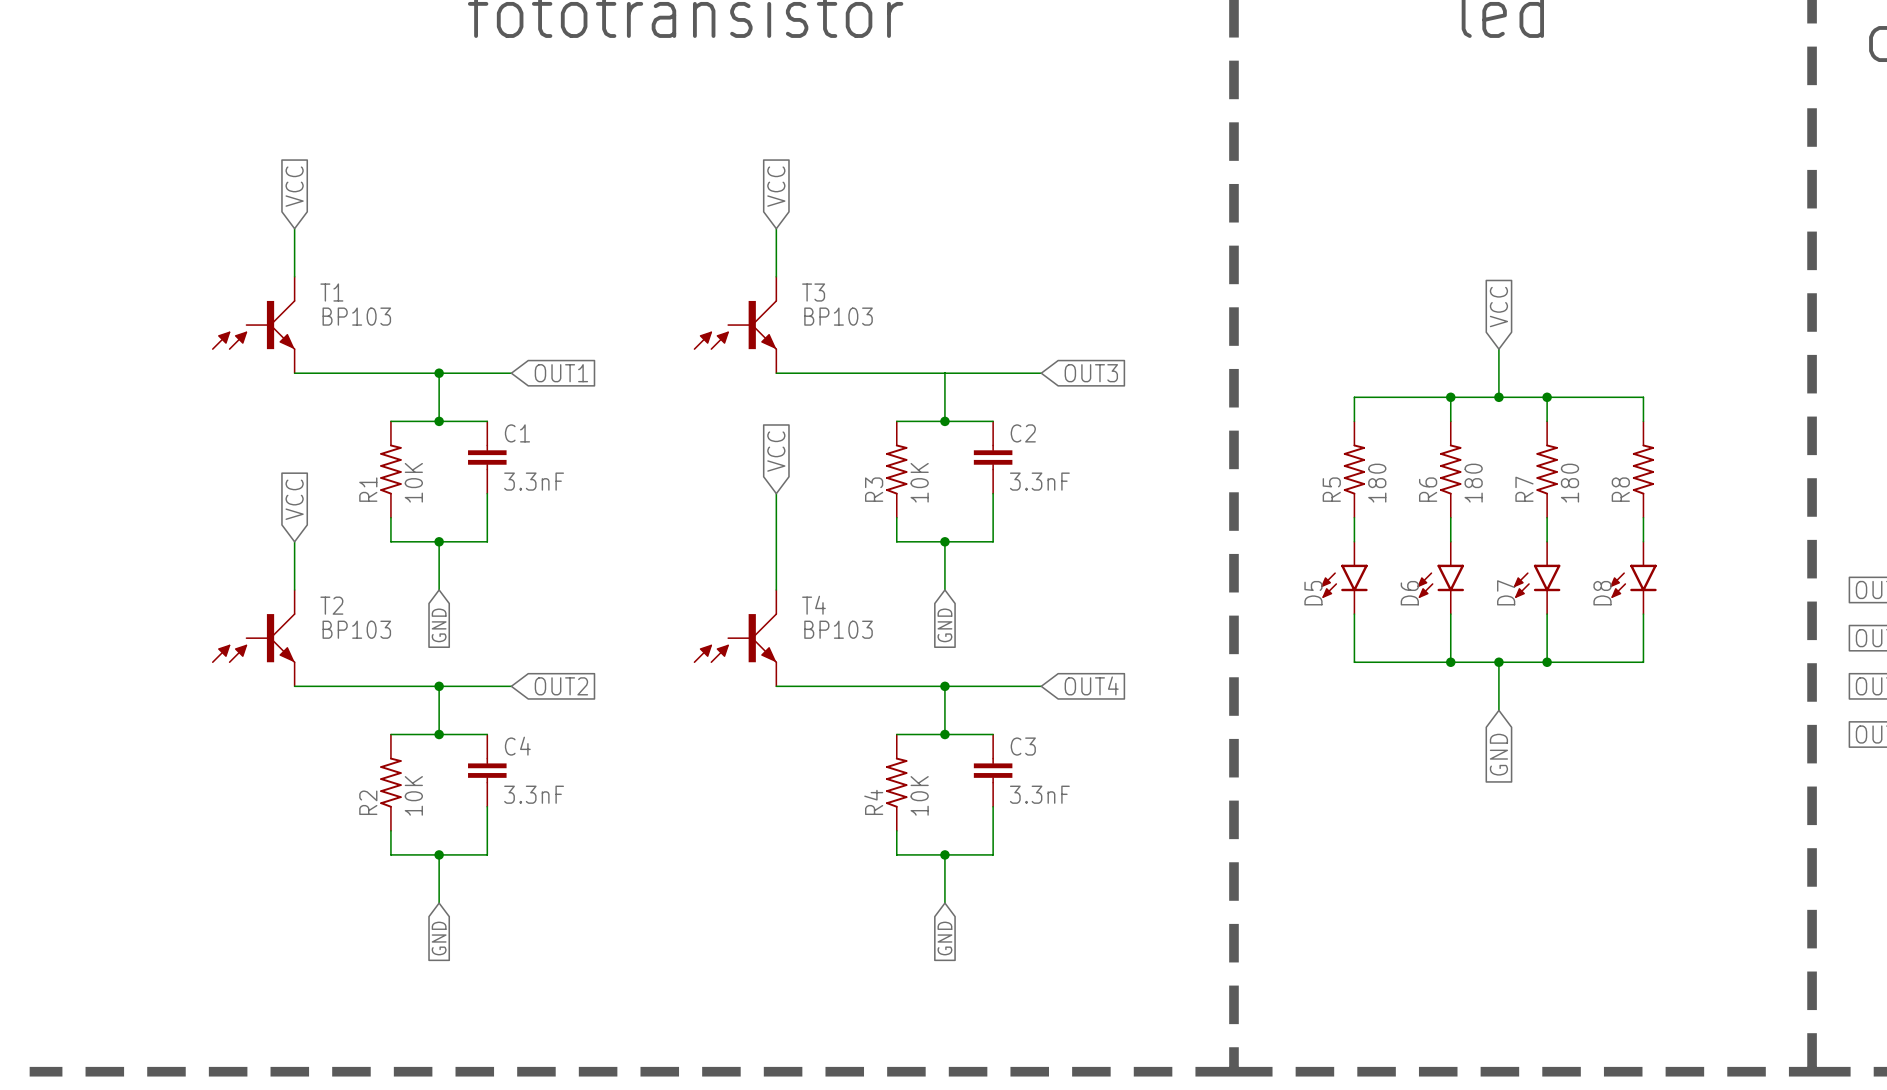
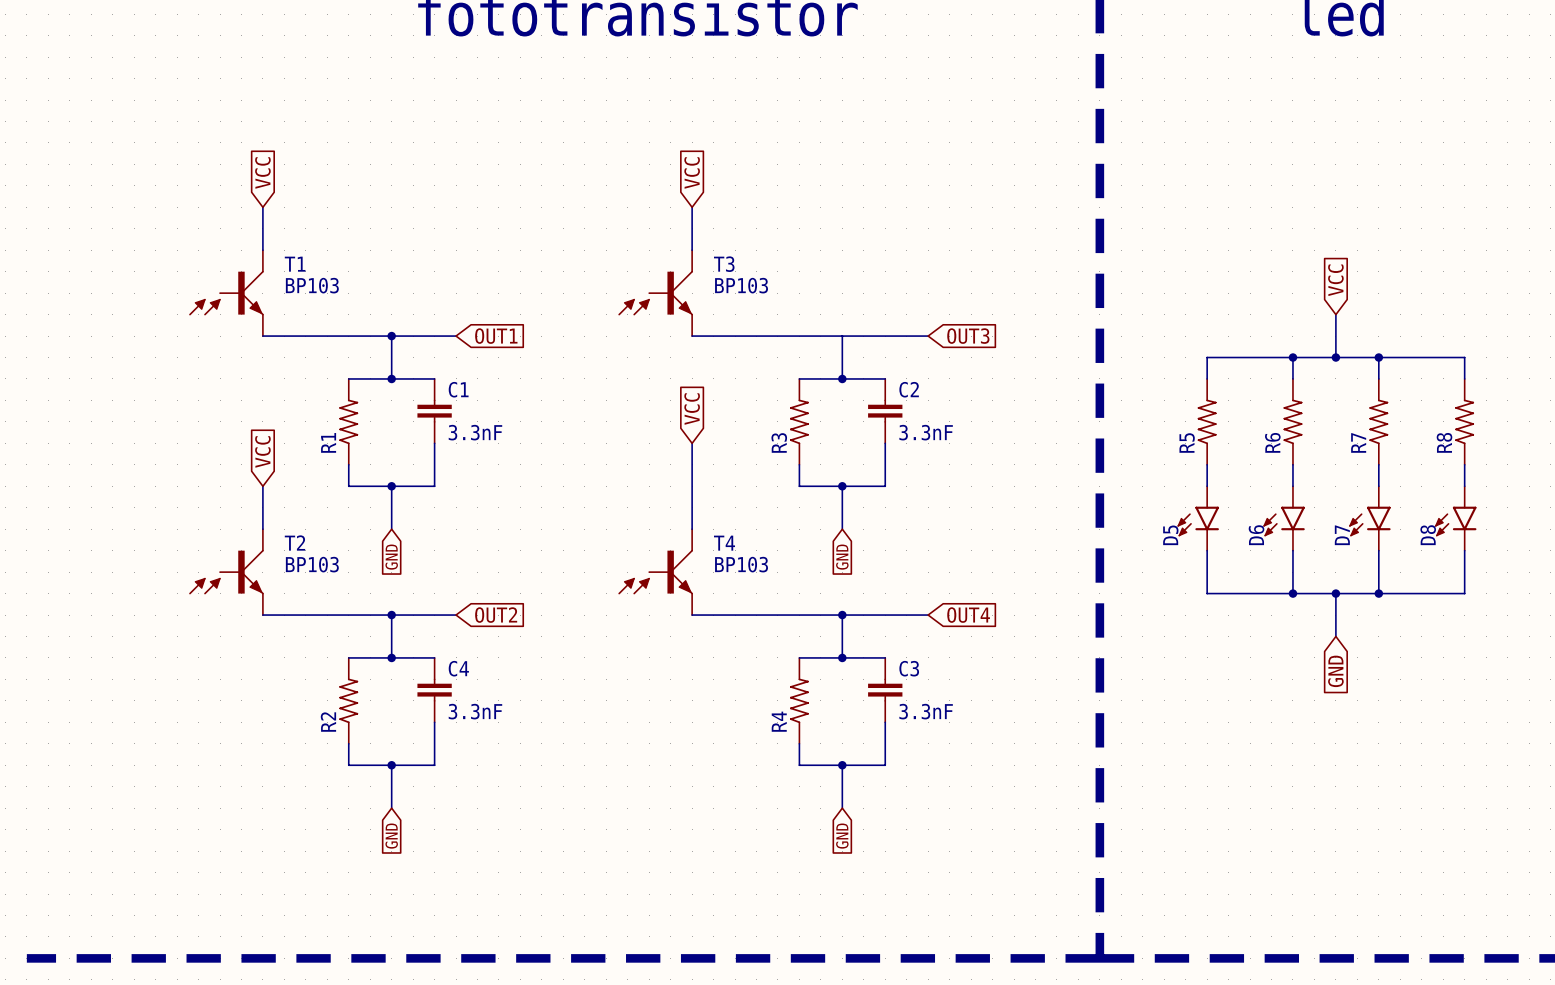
R1 value: 10K (413, 482) -> none
R3 value: 10K (919, 482) -> none
R5 value: 180 (1377, 483) -> none
R6 value: 180 (1473, 483) -> none
R7 value: 180 (1569, 483) -> none
R2 value: 10K (413, 795) -> none
R4 value: 10K (919, 795) -> none

